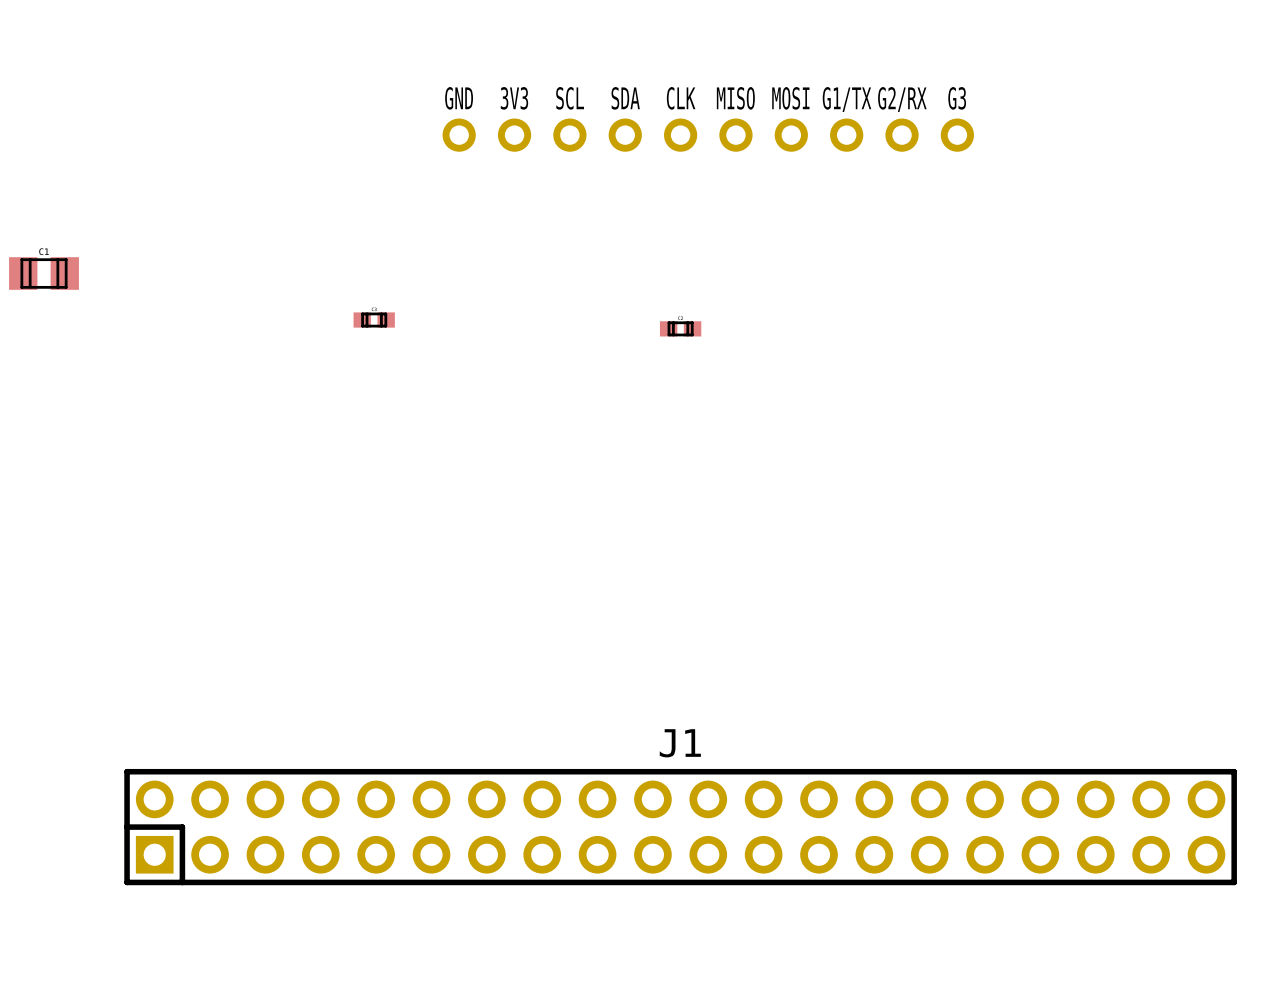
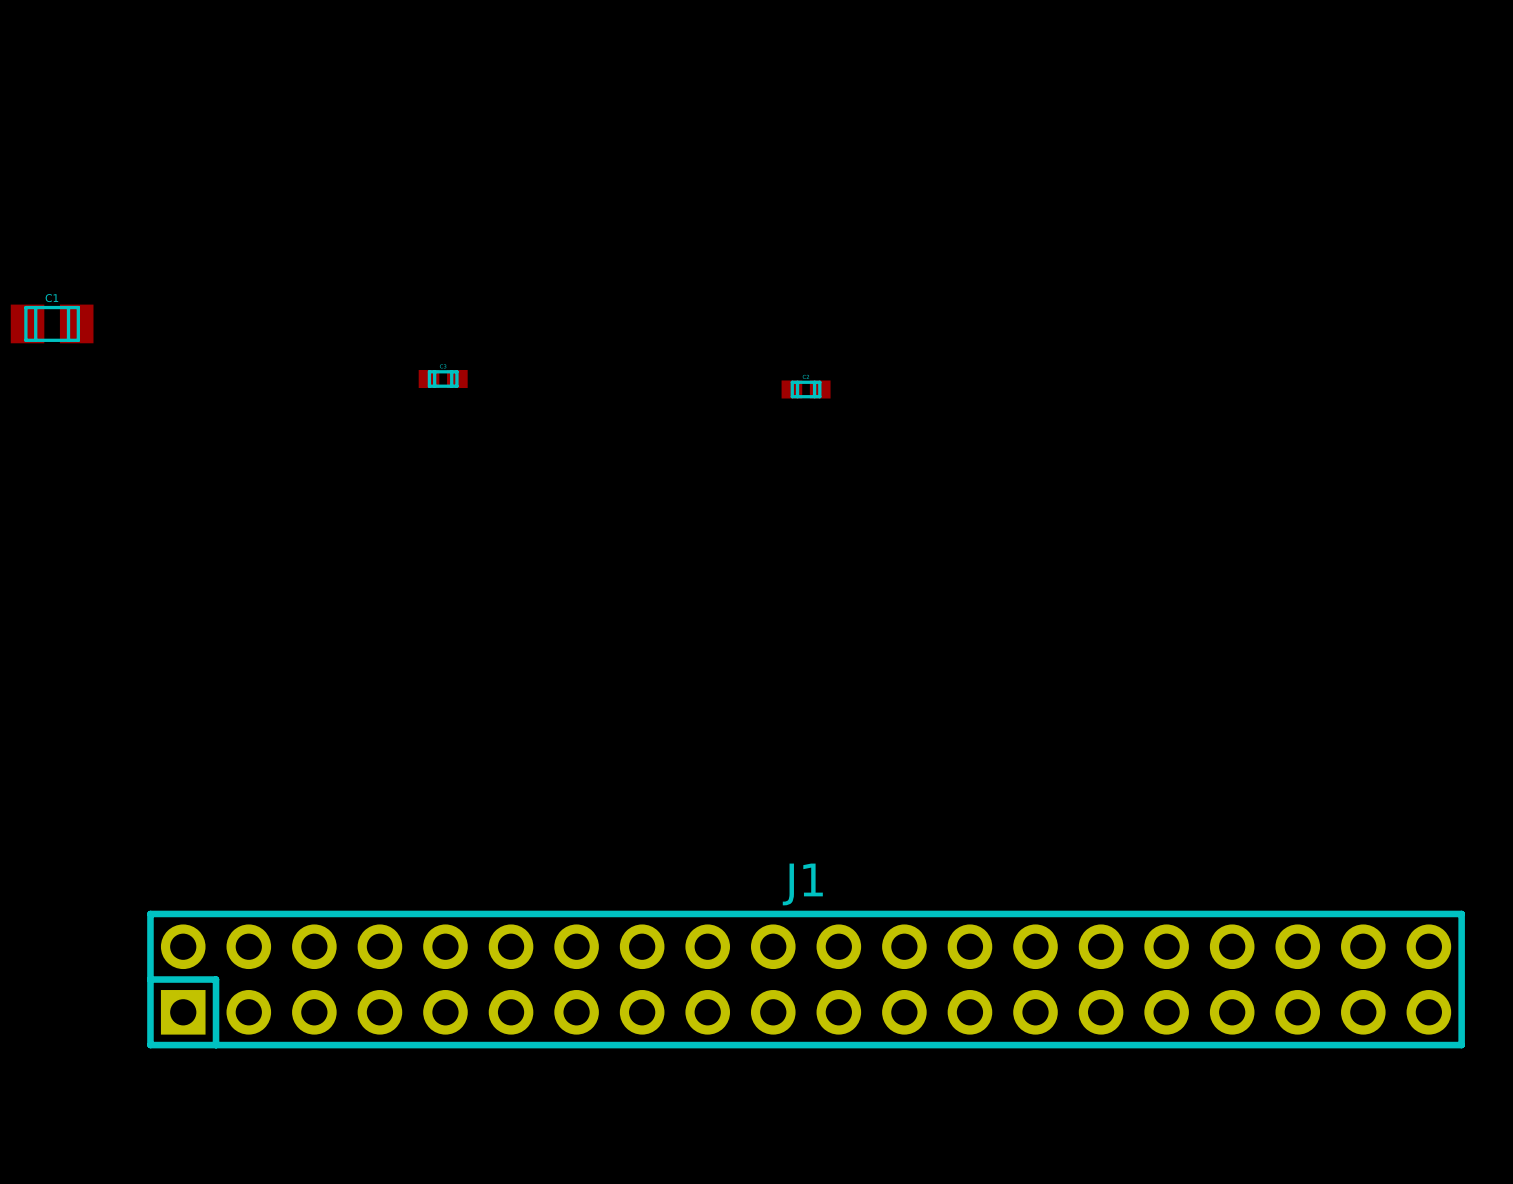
part: (708, 135) -> none

